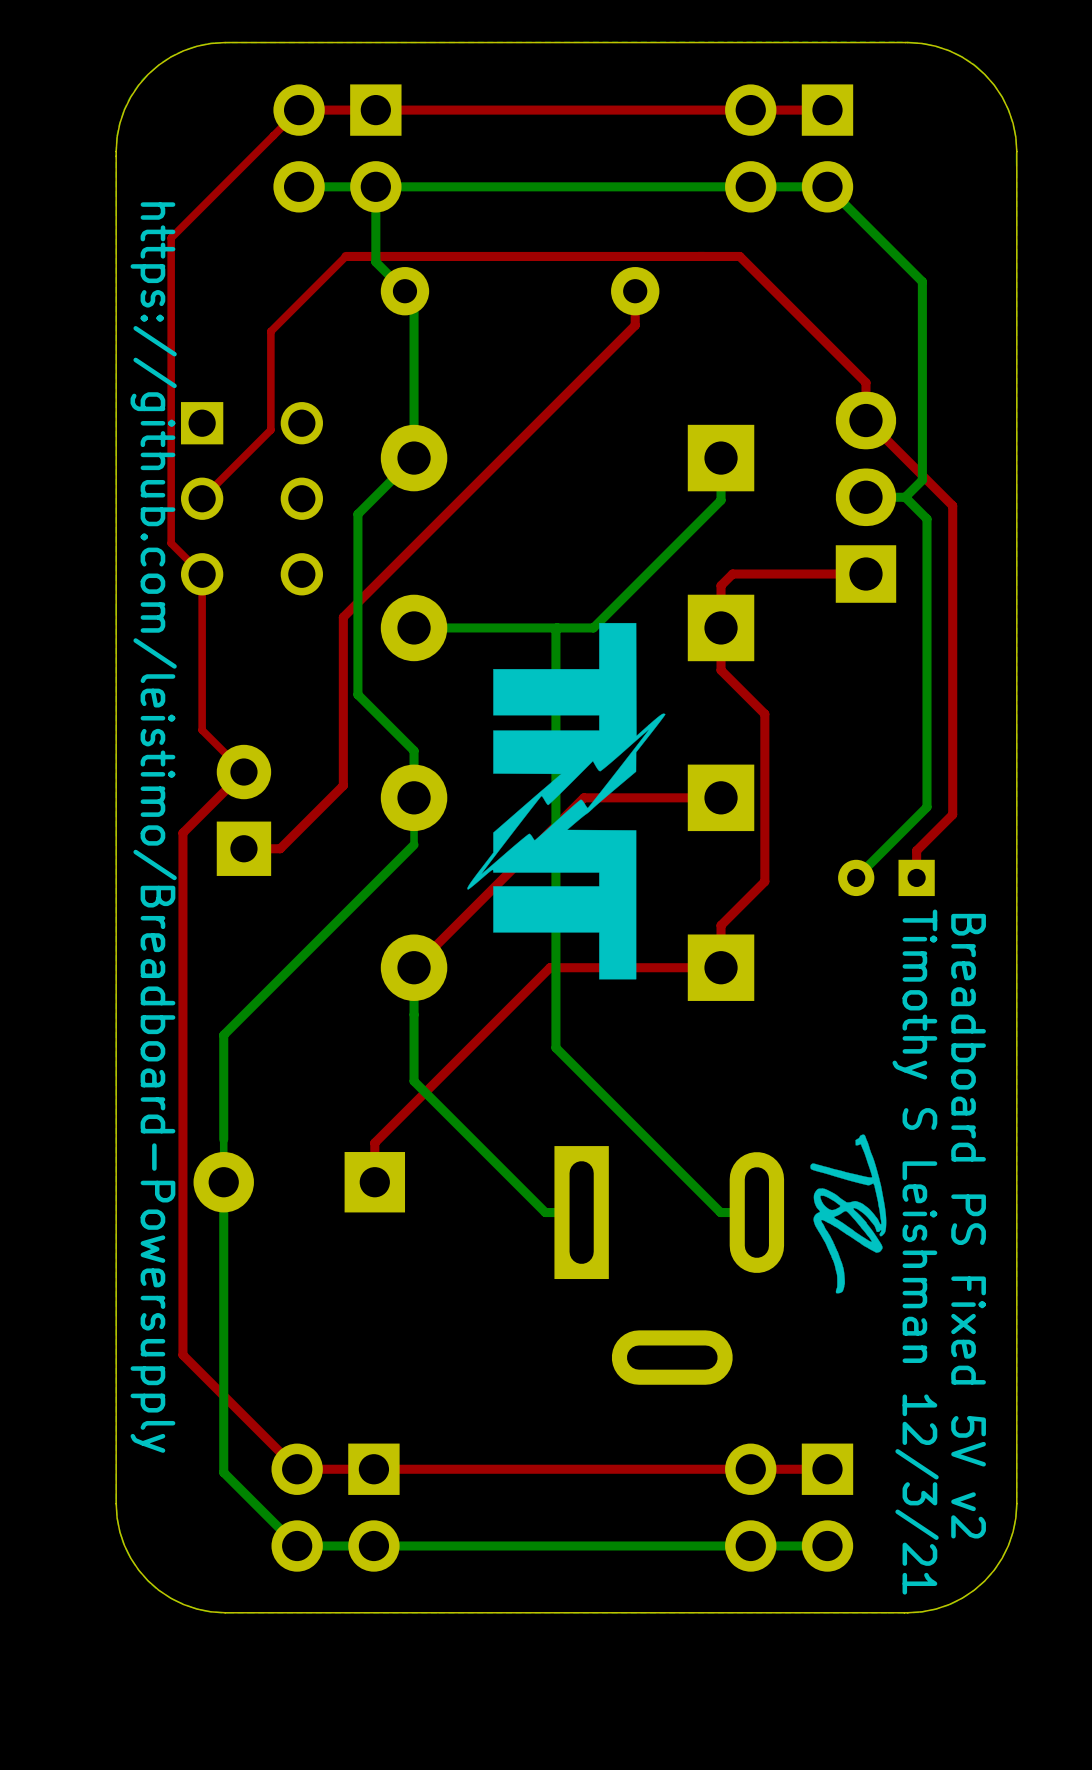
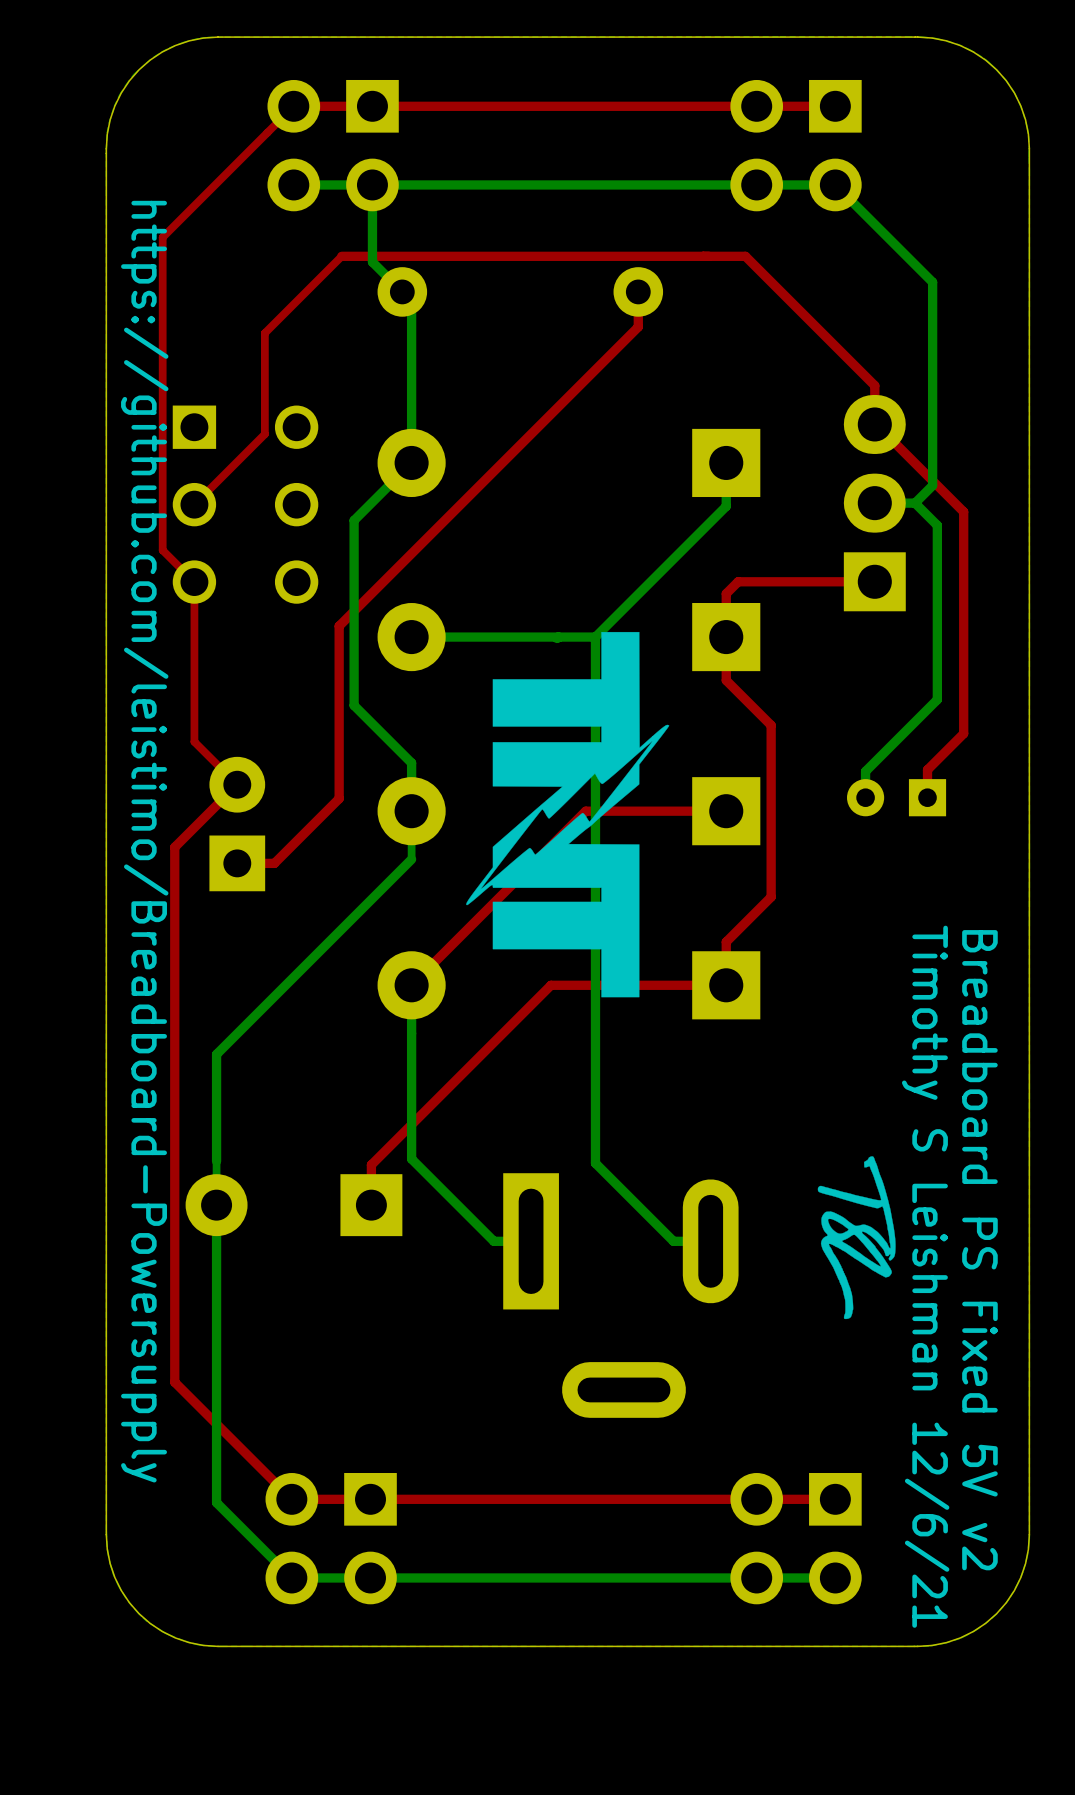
bottom track: none -> (595, 637) (595, 1163) (673, 1241) (710, 1241)
bottom track: (555, 629) (555, 1047) (720, 1212) (756, 1212) -> none
bottom track: (926, 689) (926, 807) (856, 877) -> (937, 699) (865, 771) (865, 797)
top track: (952, 722) (952, 814) (916, 850) (916, 877) -> (963, 733) (927, 769) (927, 797)
part position: (886, 877) -> (896, 797)
bottom track: (414, 1081) (545, 1212) (581, 1212) -> (411, 1101) (411, 1159) (493, 1241) (531, 1241)
text: Timothy S Leishman 12/3/21 (915, 1252) -> Timothy S Leishman 12/6/21 (925, 1276)
part position: (669, 1265) -> (620, 1295)

